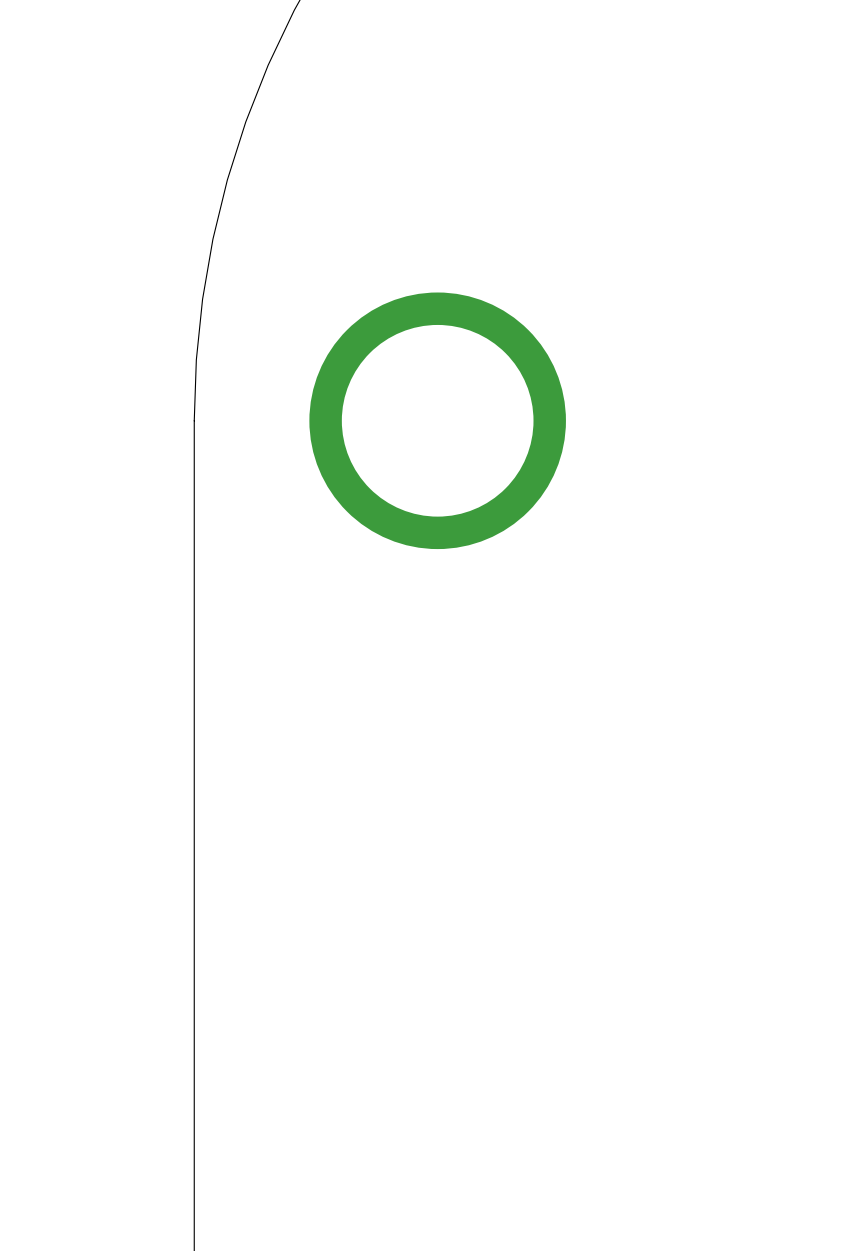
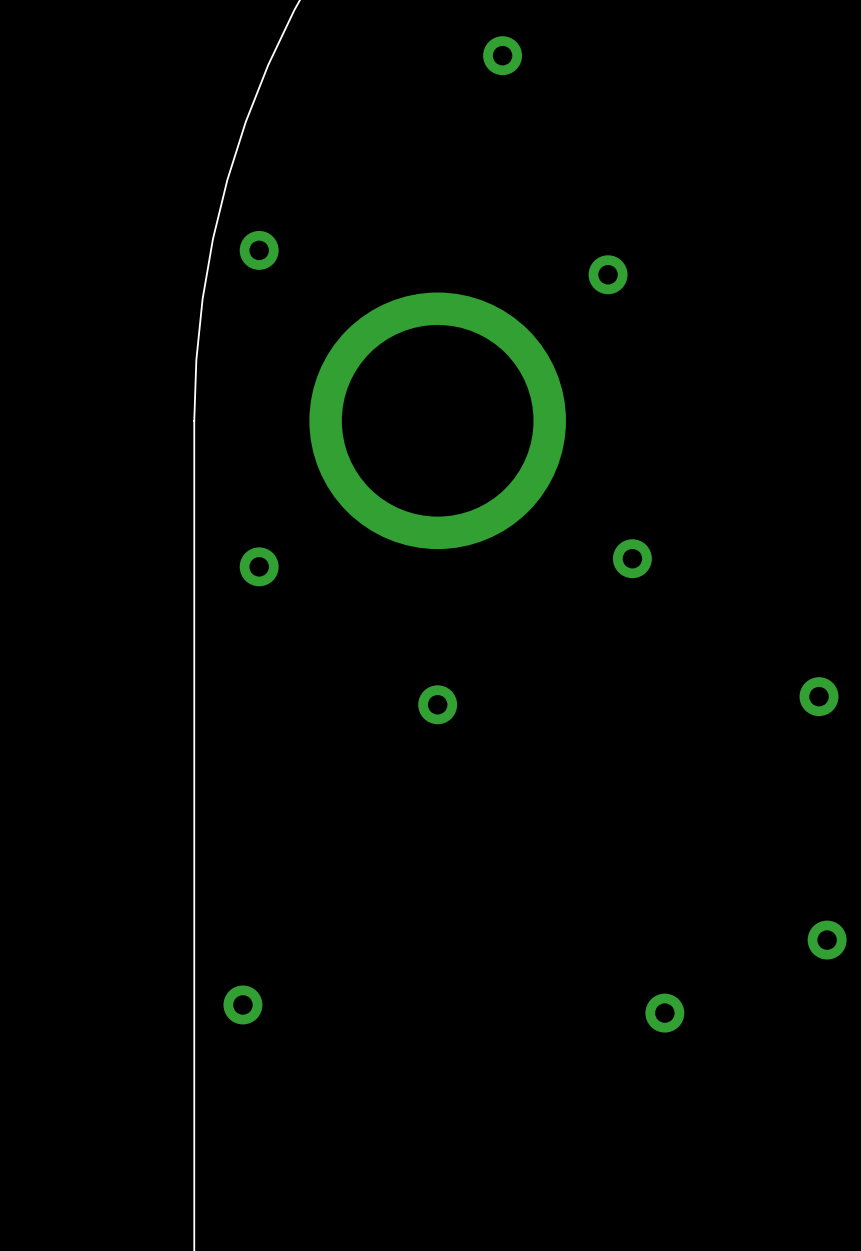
via: none -> (502, 55)
via: none -> (259, 250)
via: none -> (608, 274)
via: none -> (632, 558)
via: none -> (259, 566)
via: none -> (819, 696)
via: none -> (437, 704)
via: none -> (827, 940)
via: none -> (242, 1004)
via: none -> (664, 1013)

